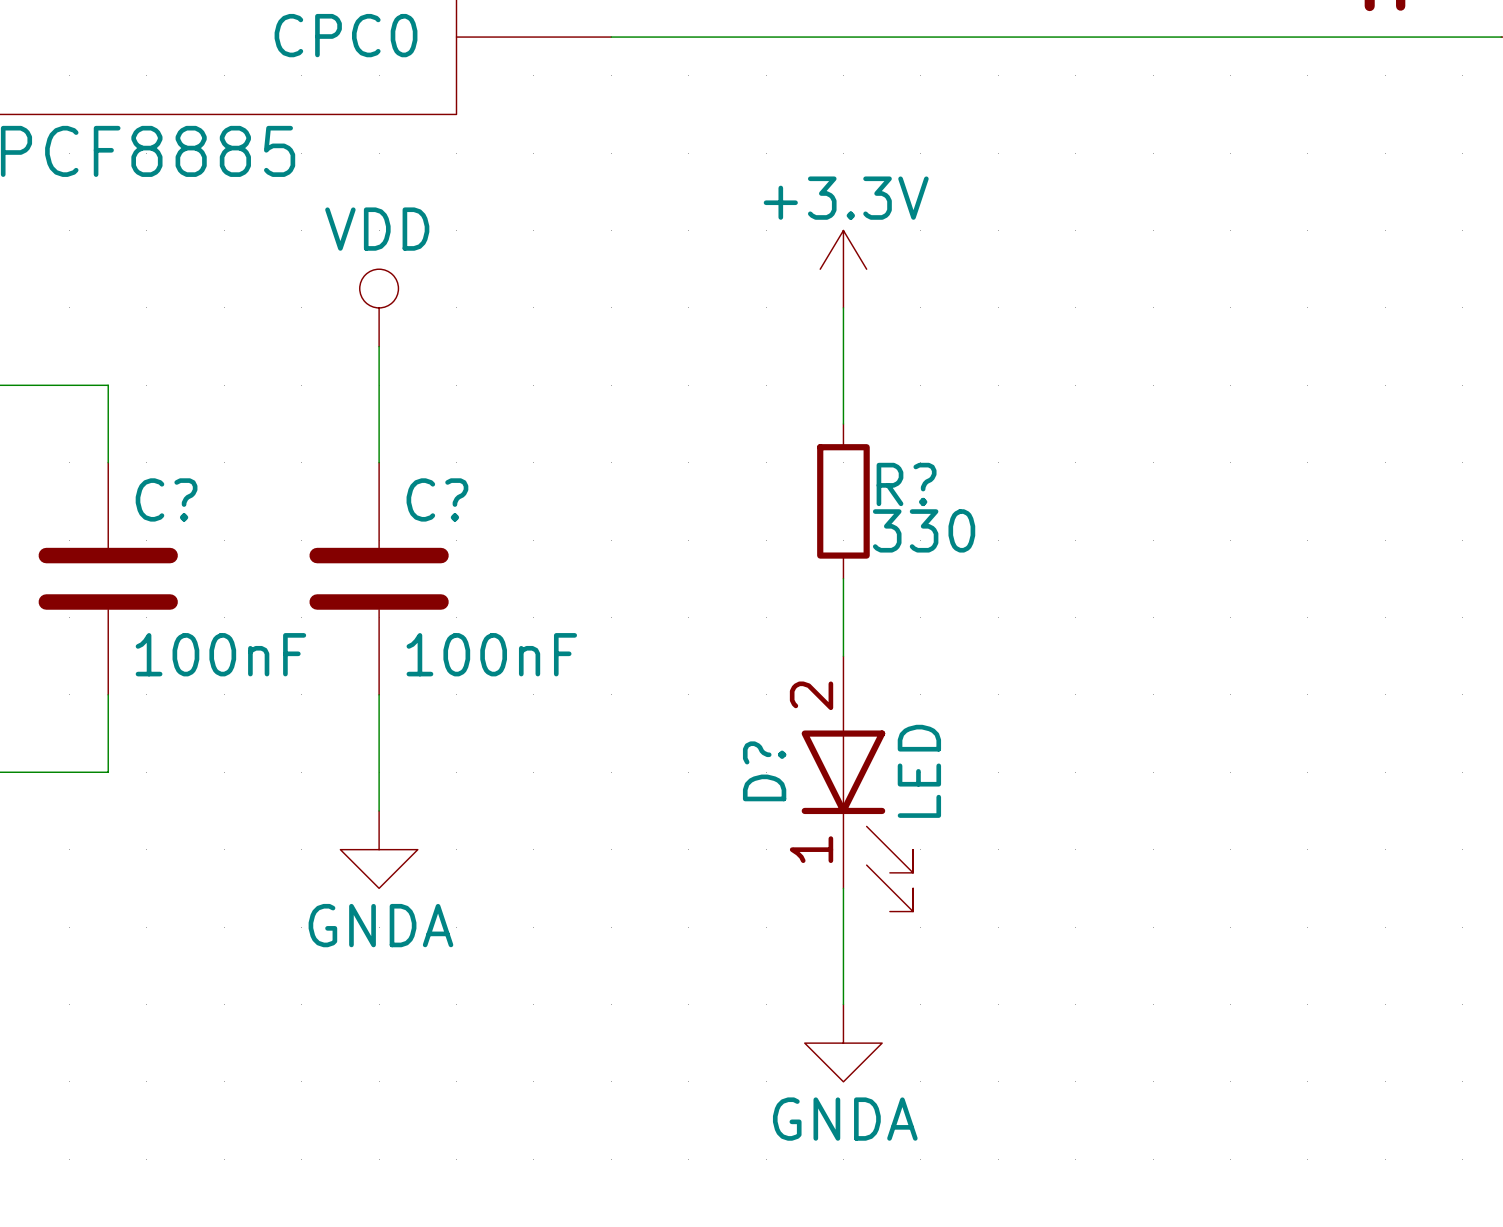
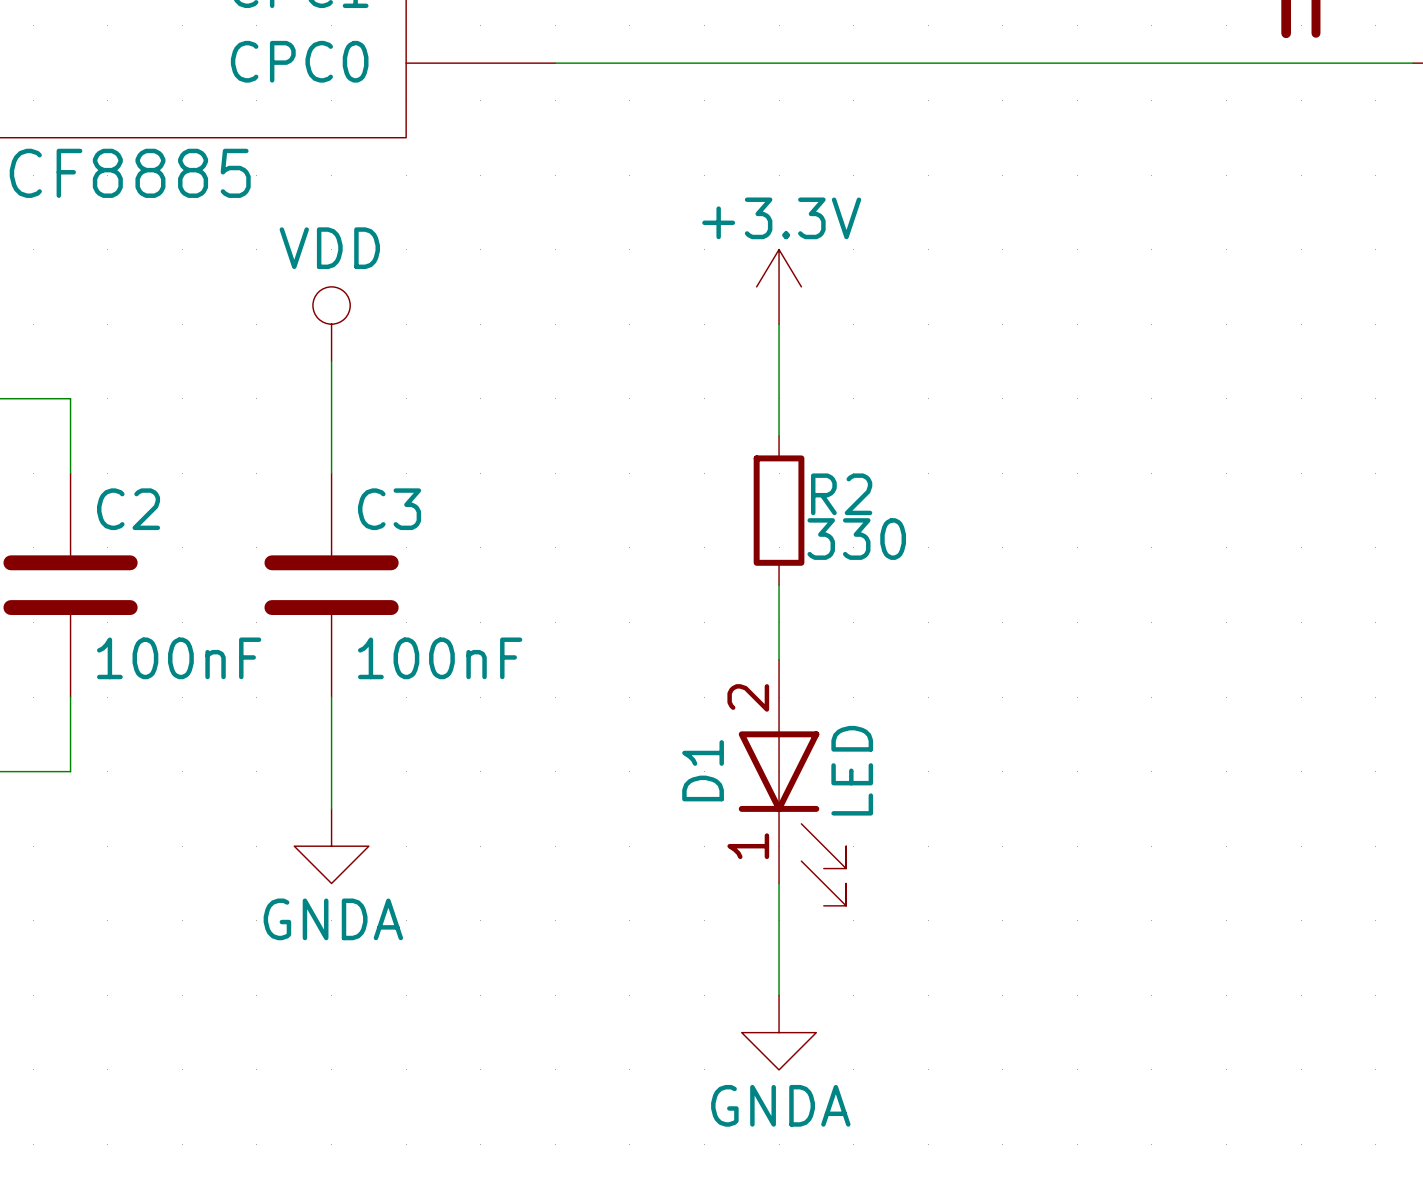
R? name: R? (906, 484) -> R2 (841, 494)
C? name: C? (166, 499) -> C2 (128, 509)
C? name: C? (437, 499) -> C3 (389, 509)
D? name: D? (764, 771) -> D1 (703, 770)

